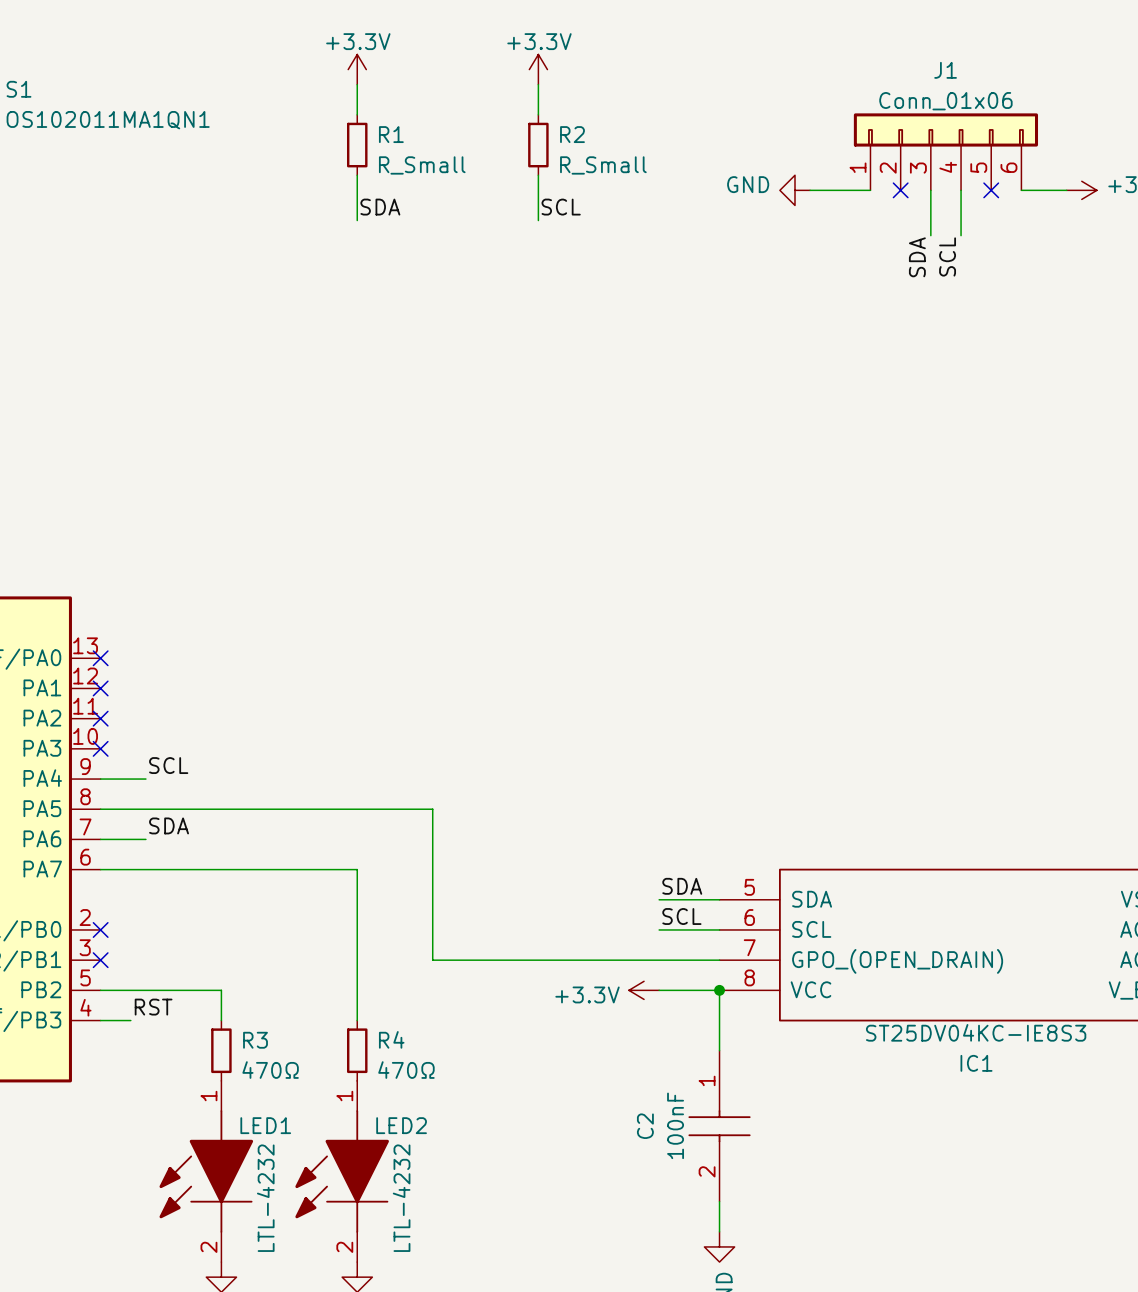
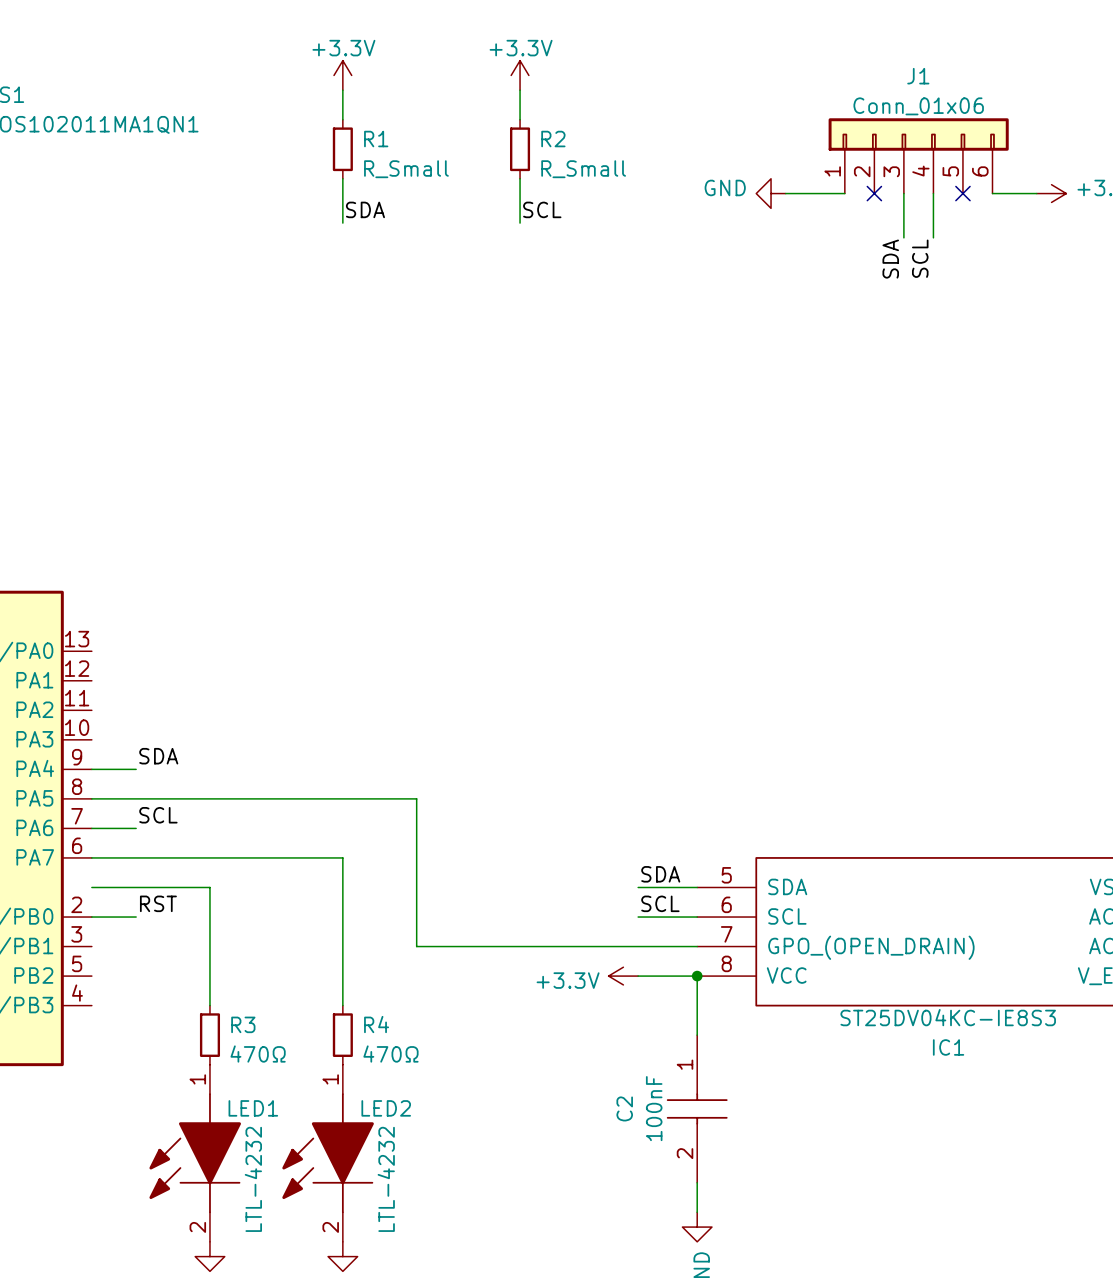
no-connect mark: (100, 658) -> none
no-connect mark: (100, 688) -> none
no-connect mark: (100, 718) -> none
no-connect mark: (100, 748) -> none
label: SCL (168, 765) -> SDA (158, 756)
label: SDA (169, 825) -> SCL (158, 815)
wire: none -> (91, 917) (136, 917)
no-connect mark: (100, 929) -> none
no-connect mark: (100, 960) -> none
wire: (100, 990) (221, 990) -> (91, 887) (209, 887) (209, 976)
label position: RST (153, 1007) -> RST (158, 903)
wire: (100, 1020) (130, 1020) -> none

